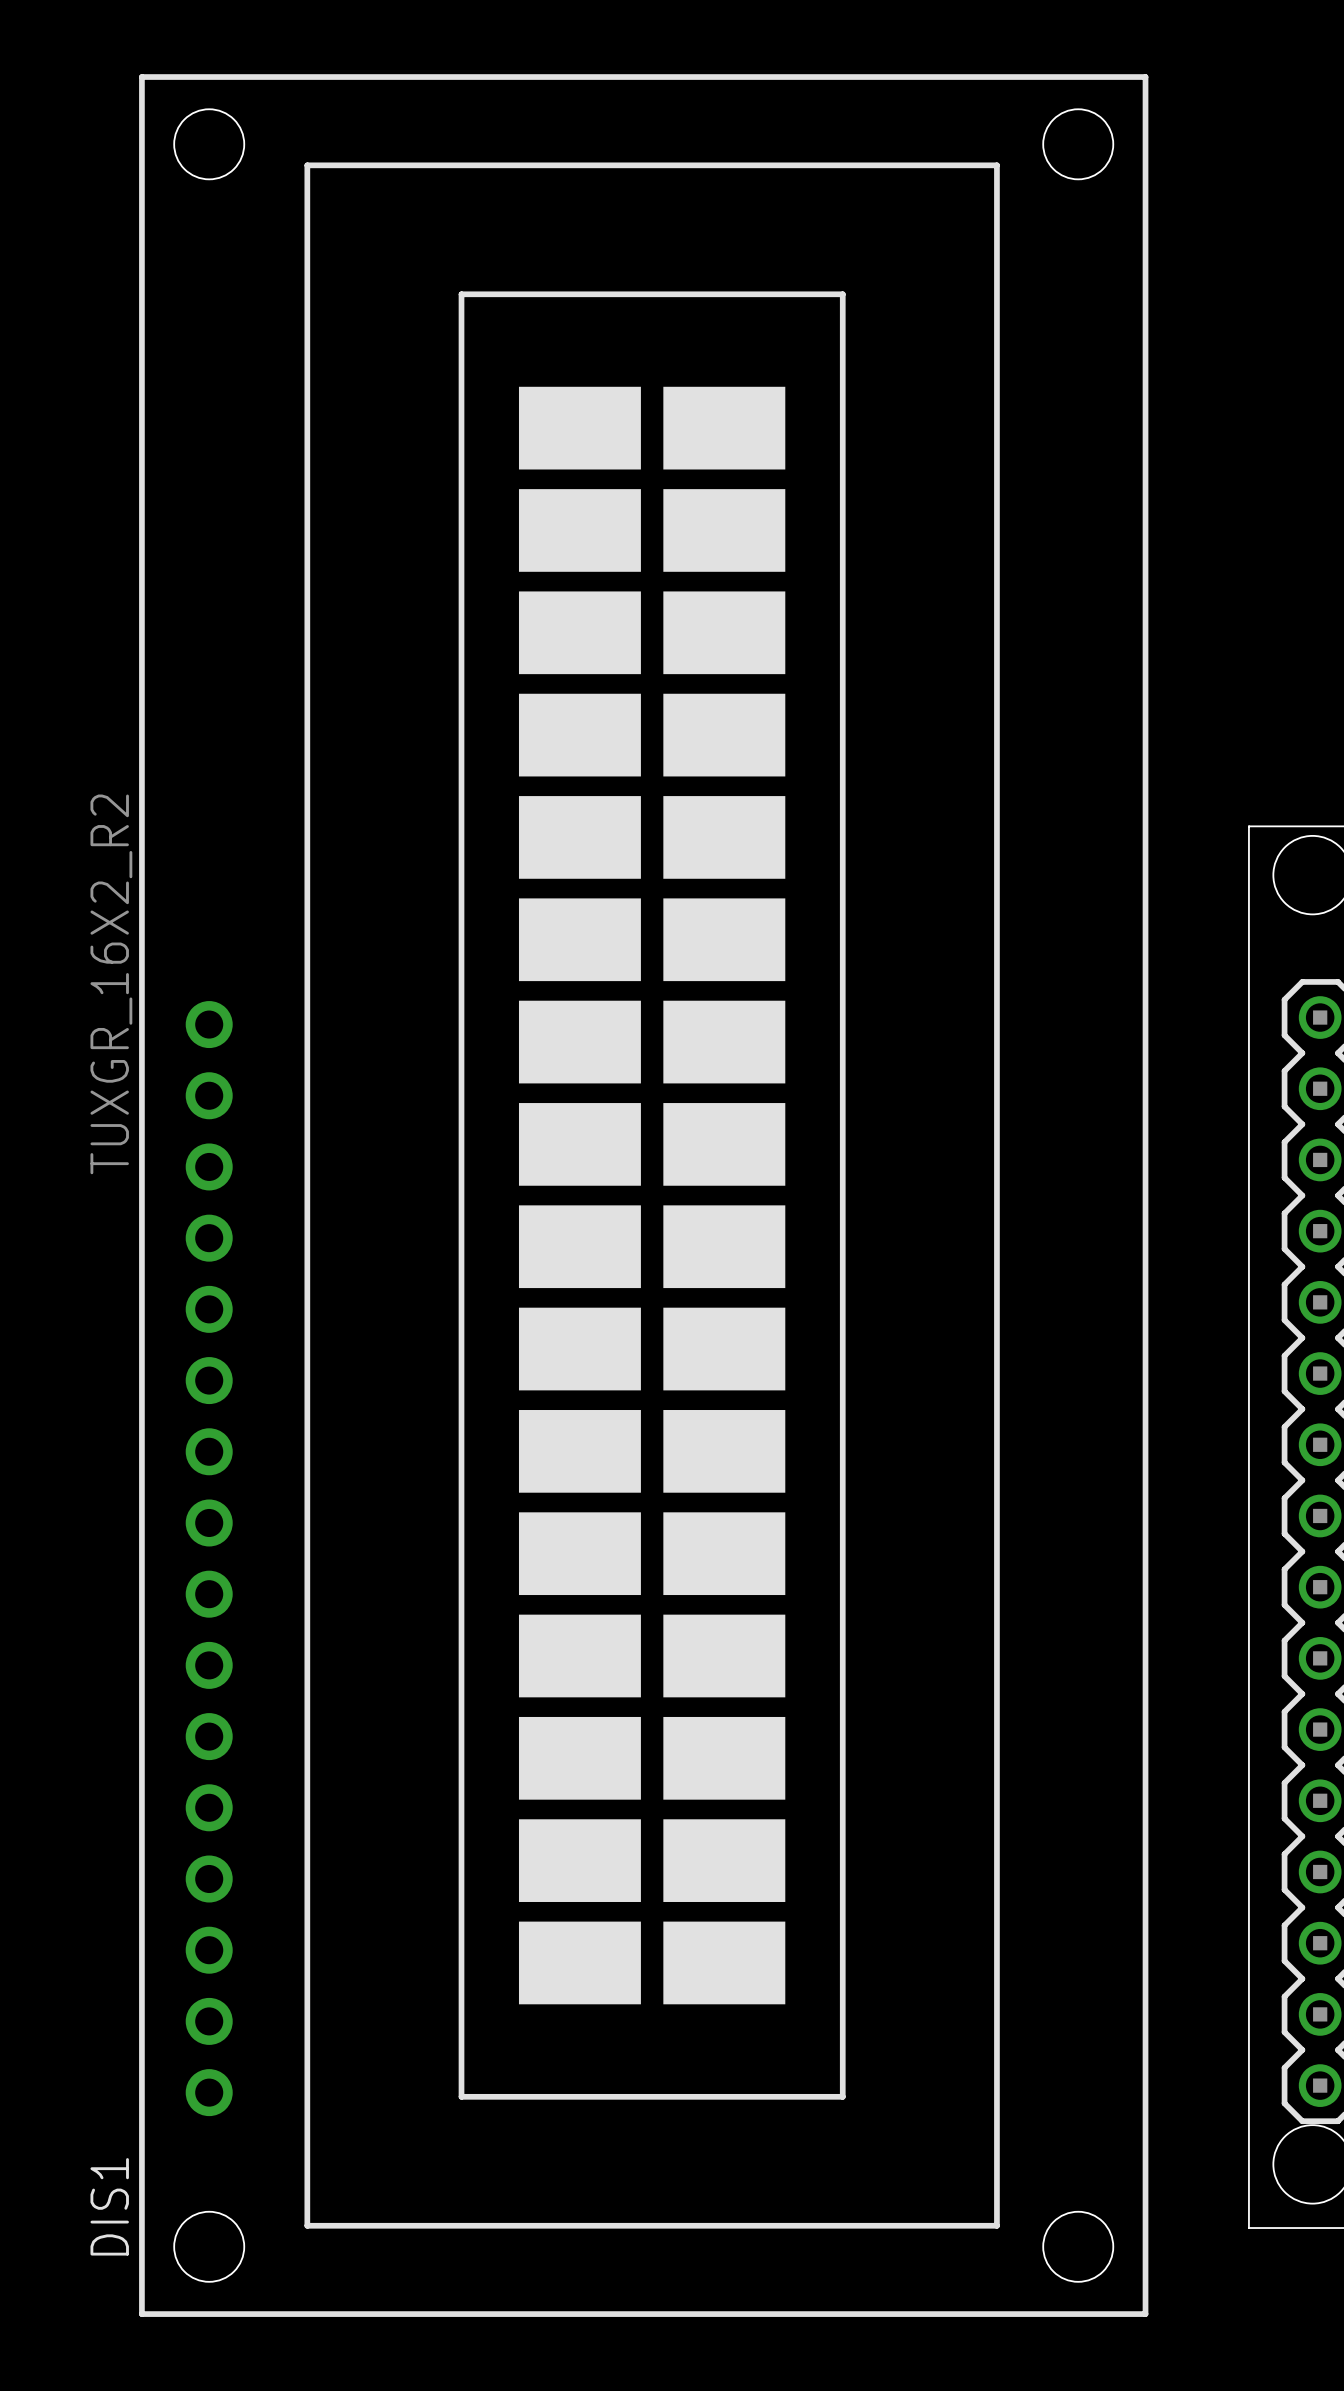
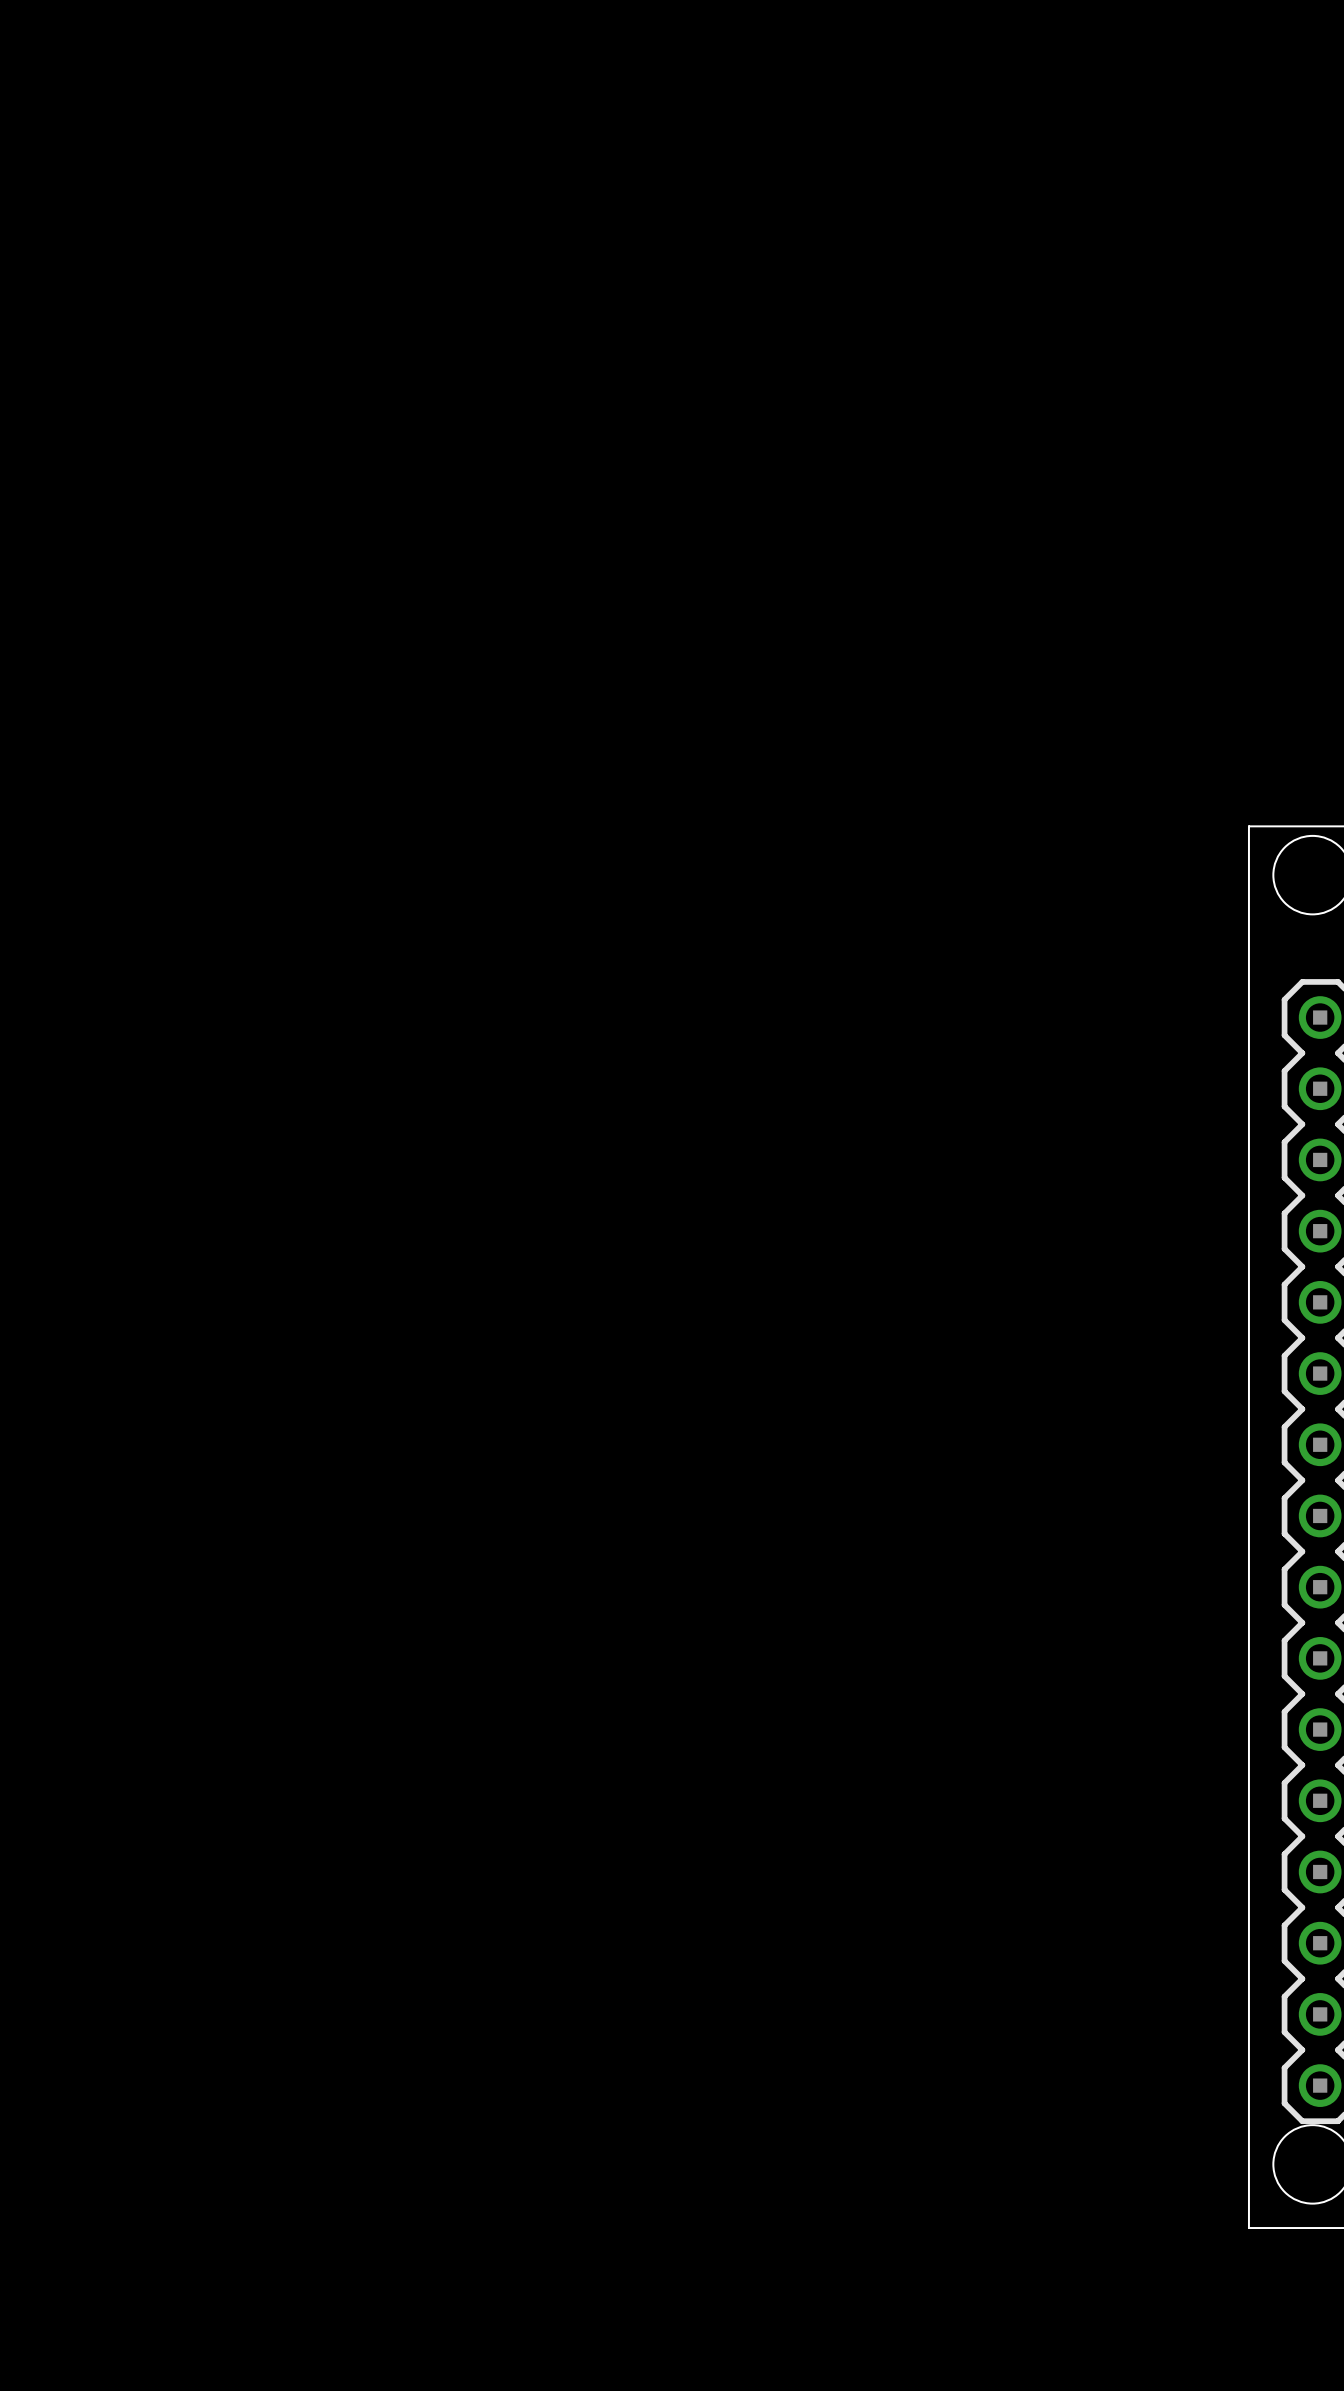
DIS1: TUXGR_16X2_R2 (643, 1195) -> none

